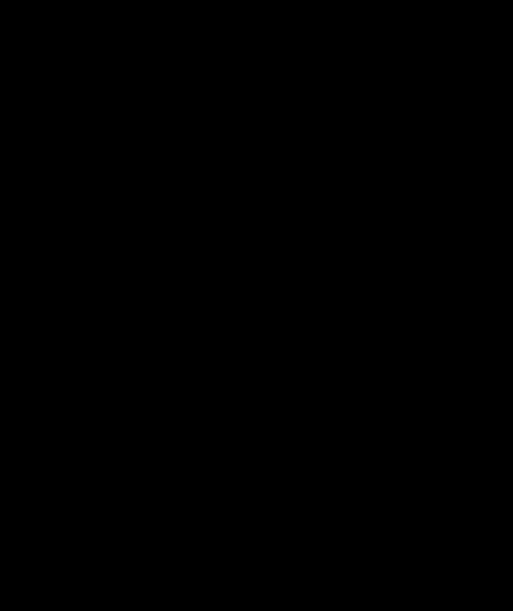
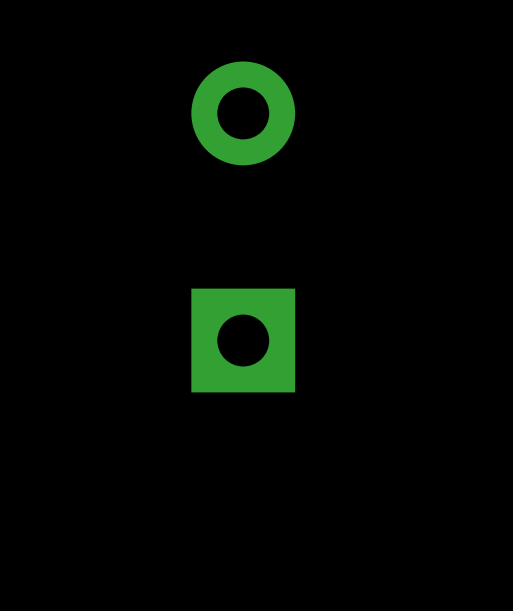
part: none -> (243, 226)

